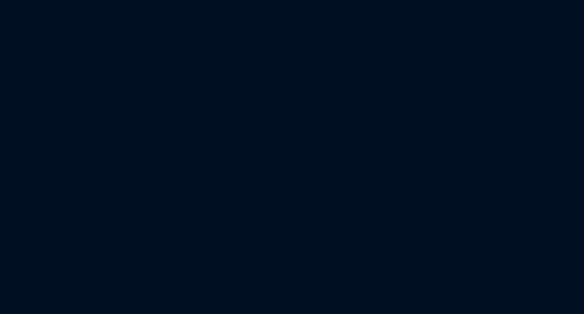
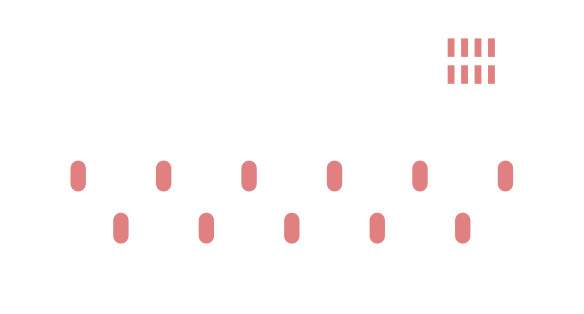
part: none -> (471, 61)
part: none -> (291, 202)

